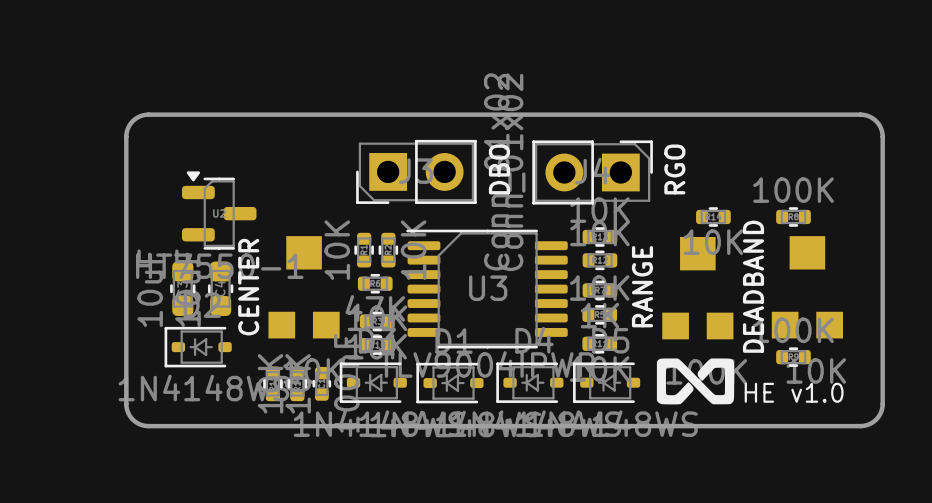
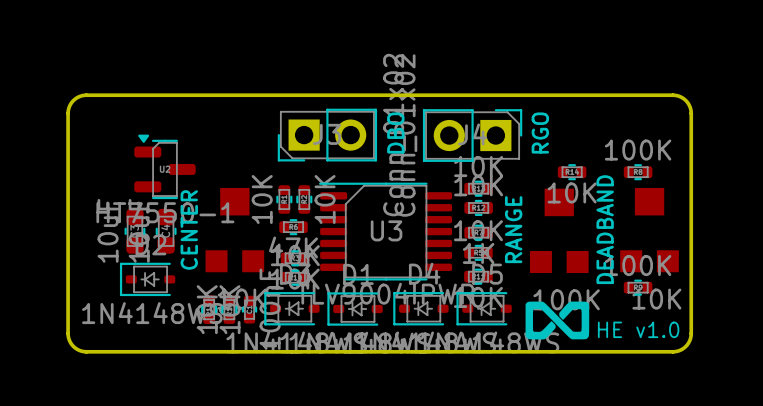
board edge: (148, 114) (867, 115) (877, 123) (882, 136) (881, 411) (874, 421) (860, 426) (141, 424) (131, 417) (126, 403) (126, 136) (128, 127) (132, 121) (138, 116) (148, 114) -> (86, 95) (678, 96) (688, 103) (691, 113) (690, 339) (684, 347) (672, 351) (80, 350) (72, 344) (68, 333) (68, 113) (73, 100) (86, 95)
drawing position: (695, 381) -> (557, 320)
text position: HE v1.0 (794, 392) -> HE v1.0 (638, 329)

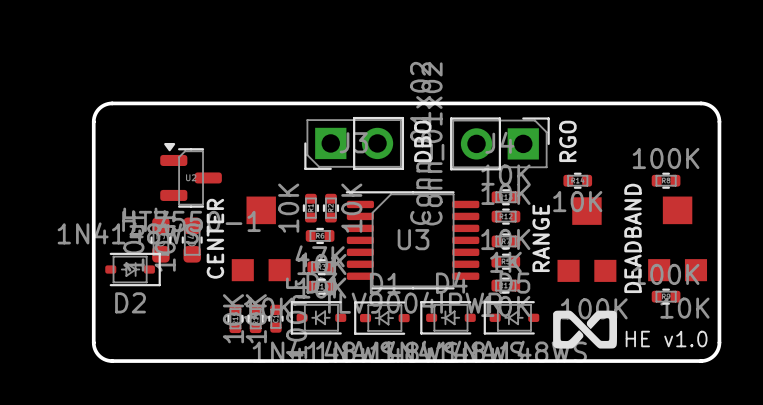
part position: (572, 172) -> (577, 180)
D2 rotation: 0° (147, 279) -> 180° (133, 269)
D2 position: (147, 279) -> (133, 269)

